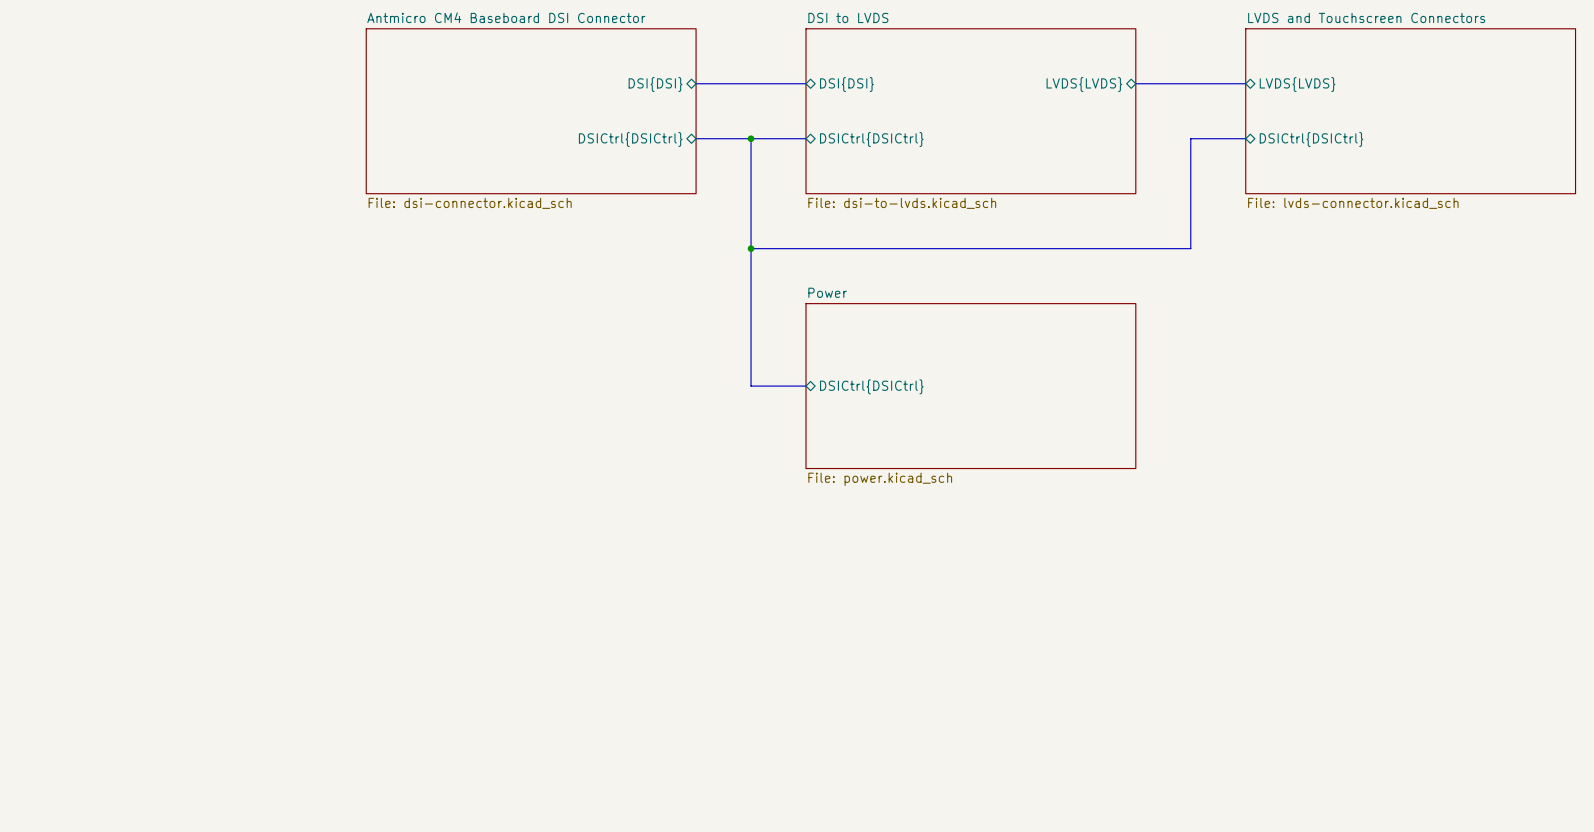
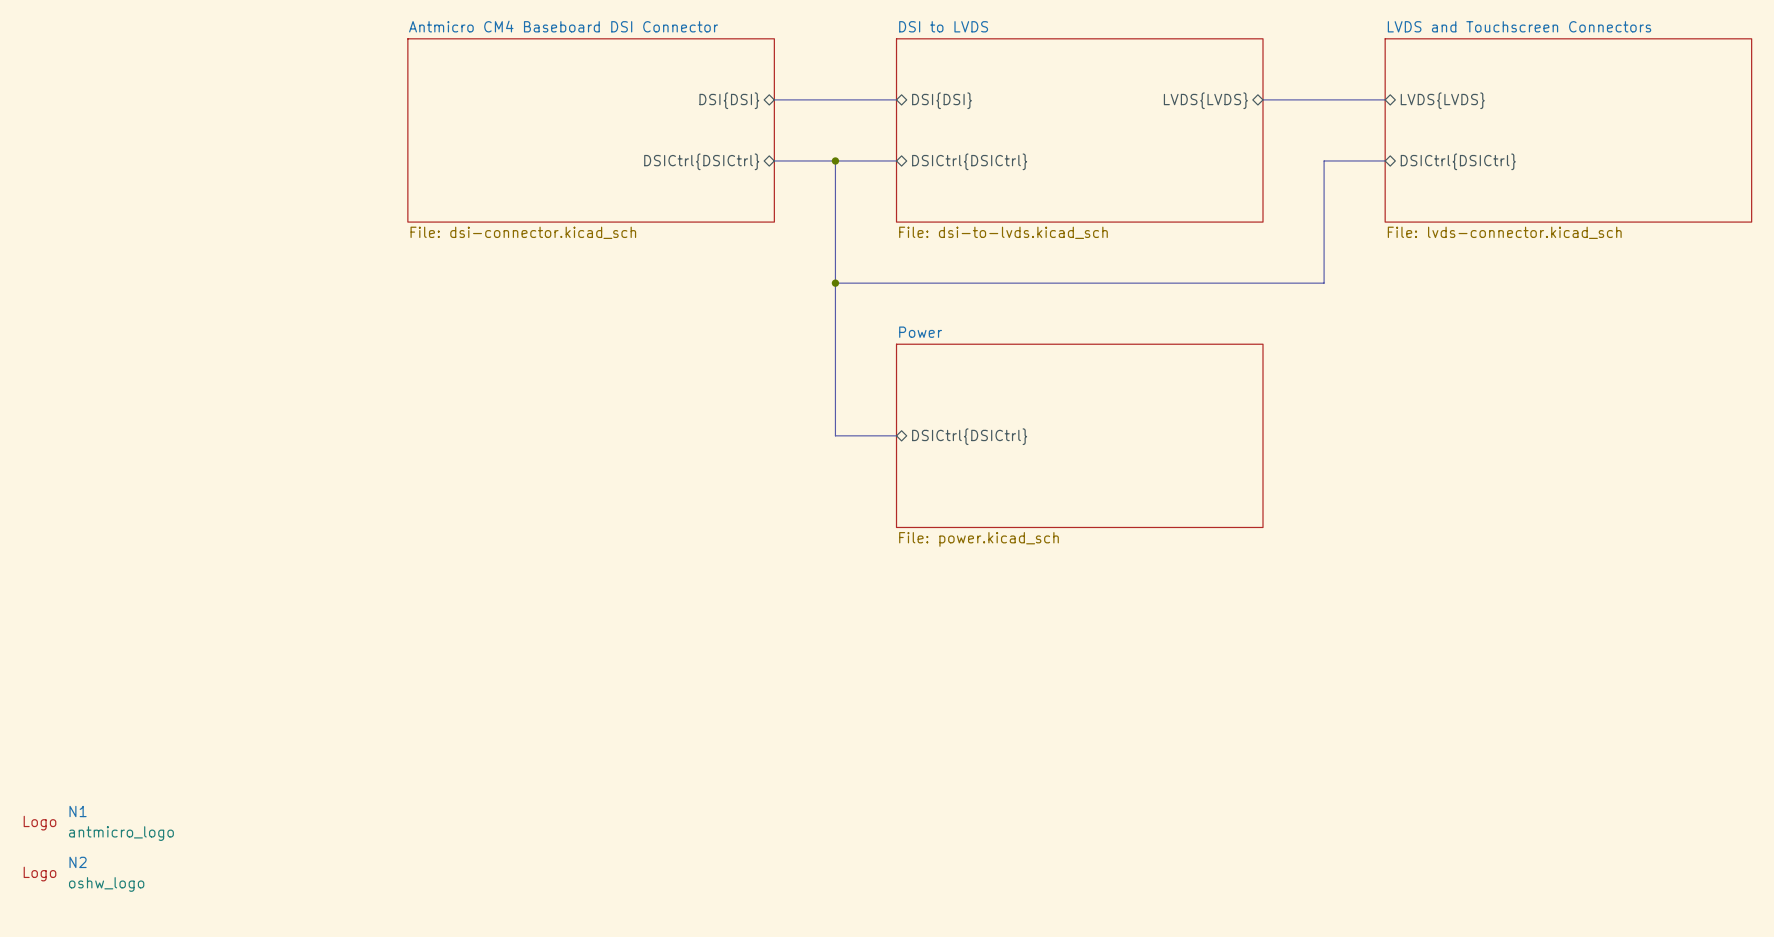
N1: none -> antmicro_logo (98, 823)
N2: none -> oshw_logo (83, 874)

